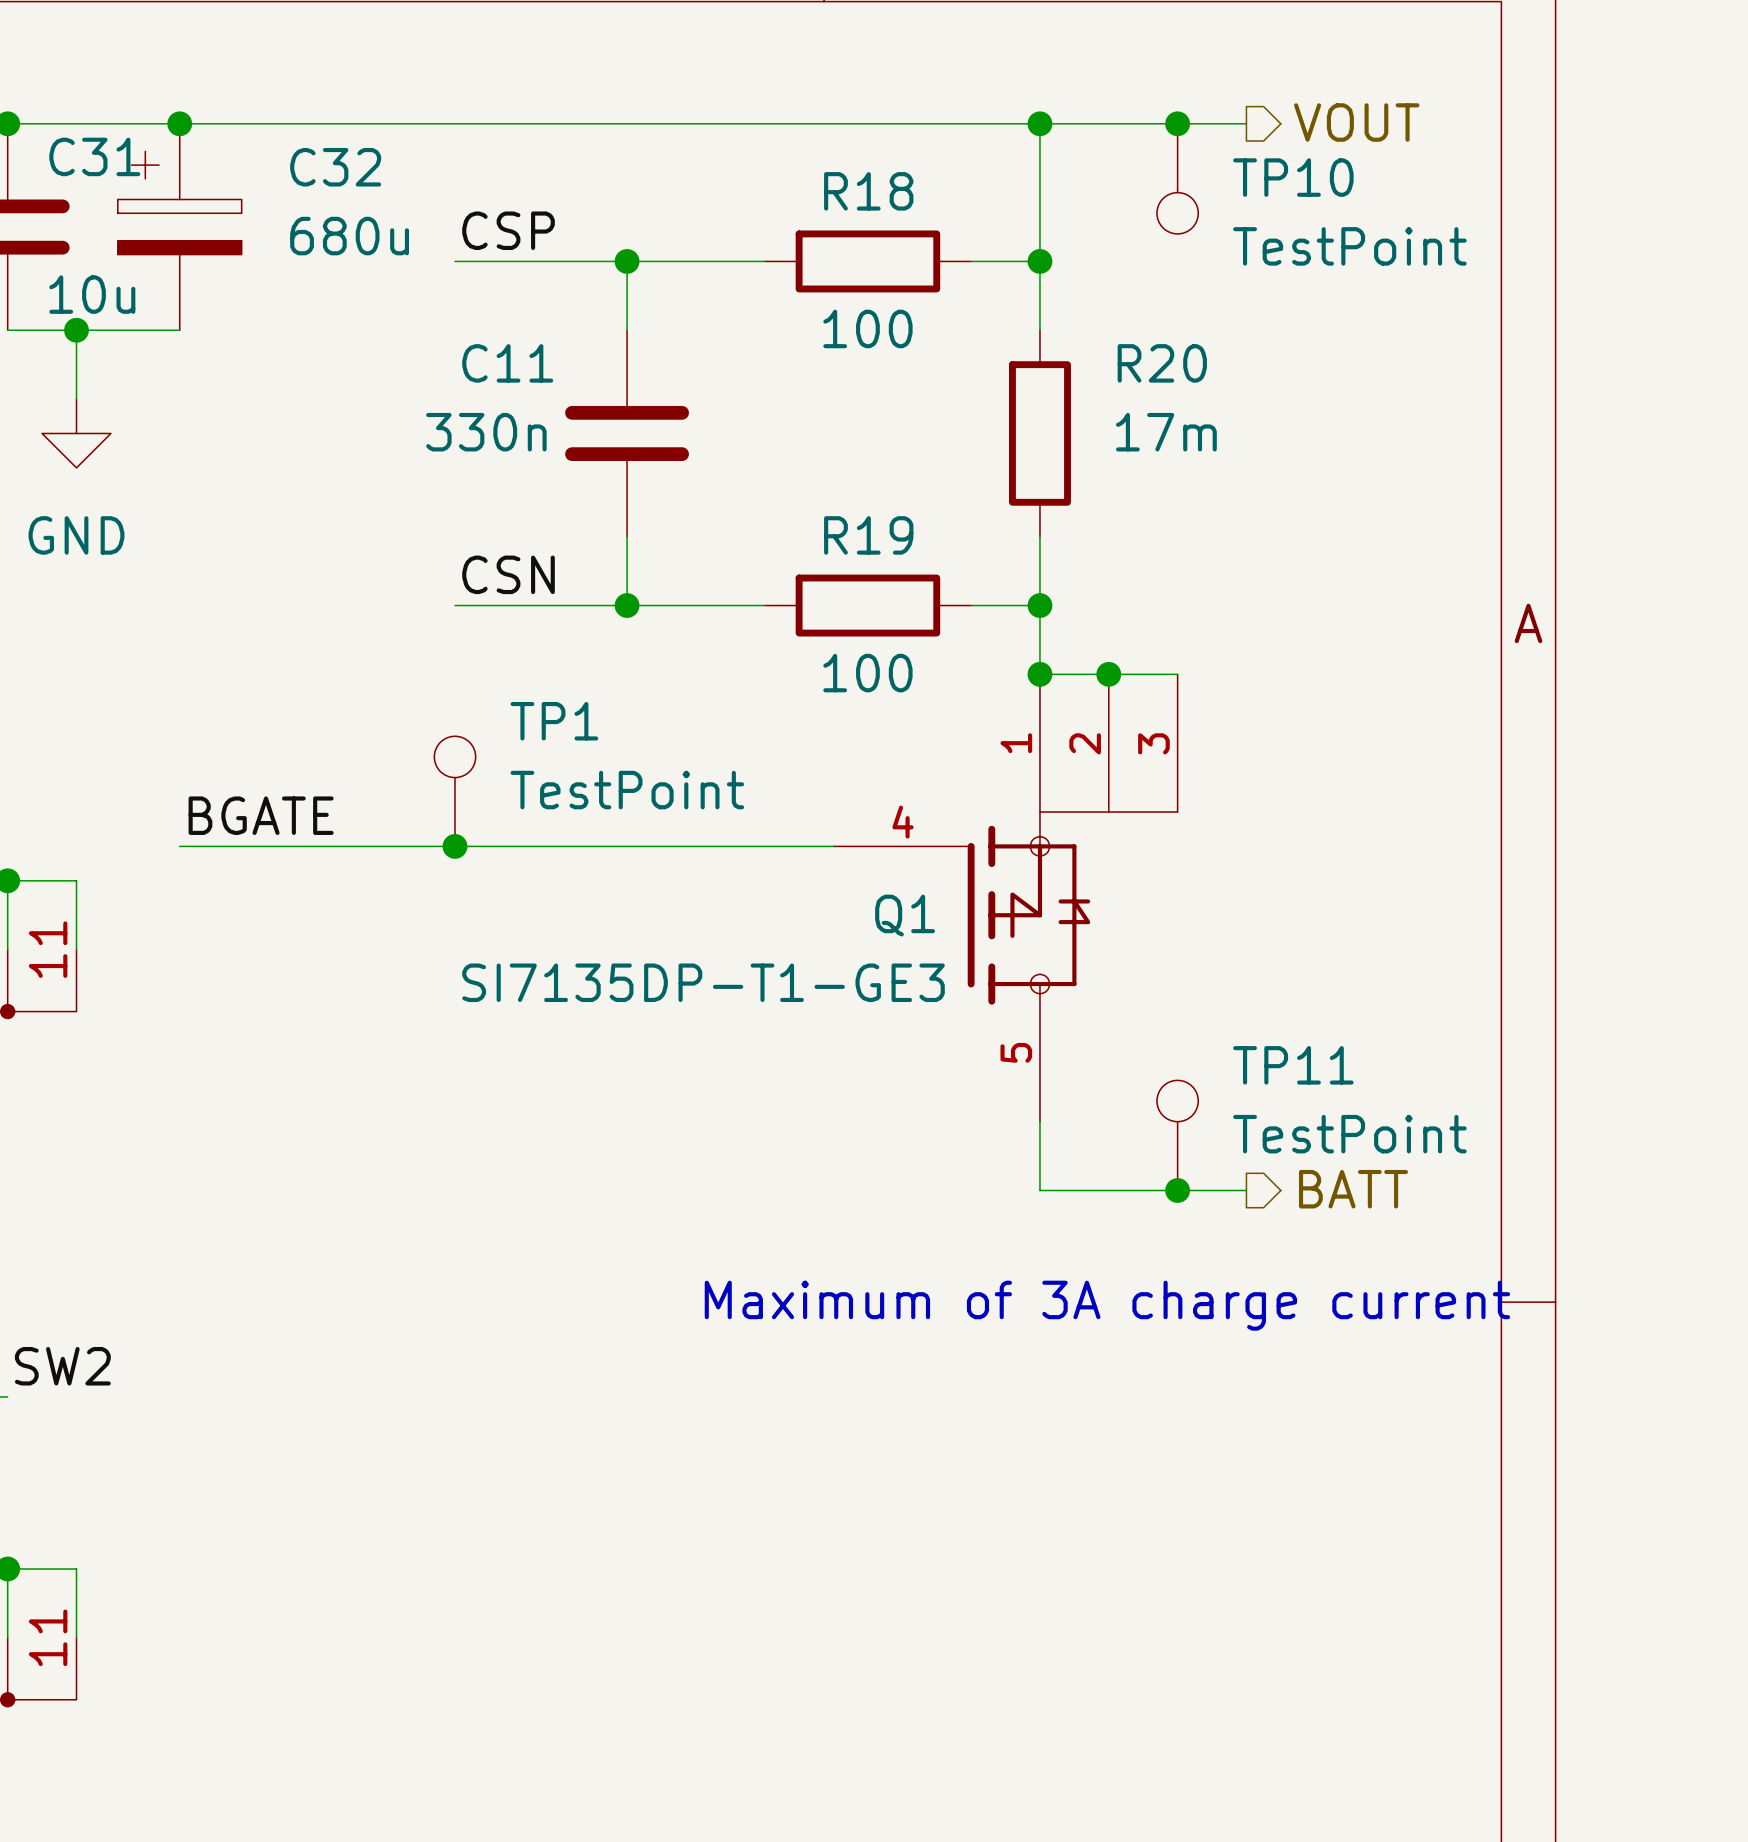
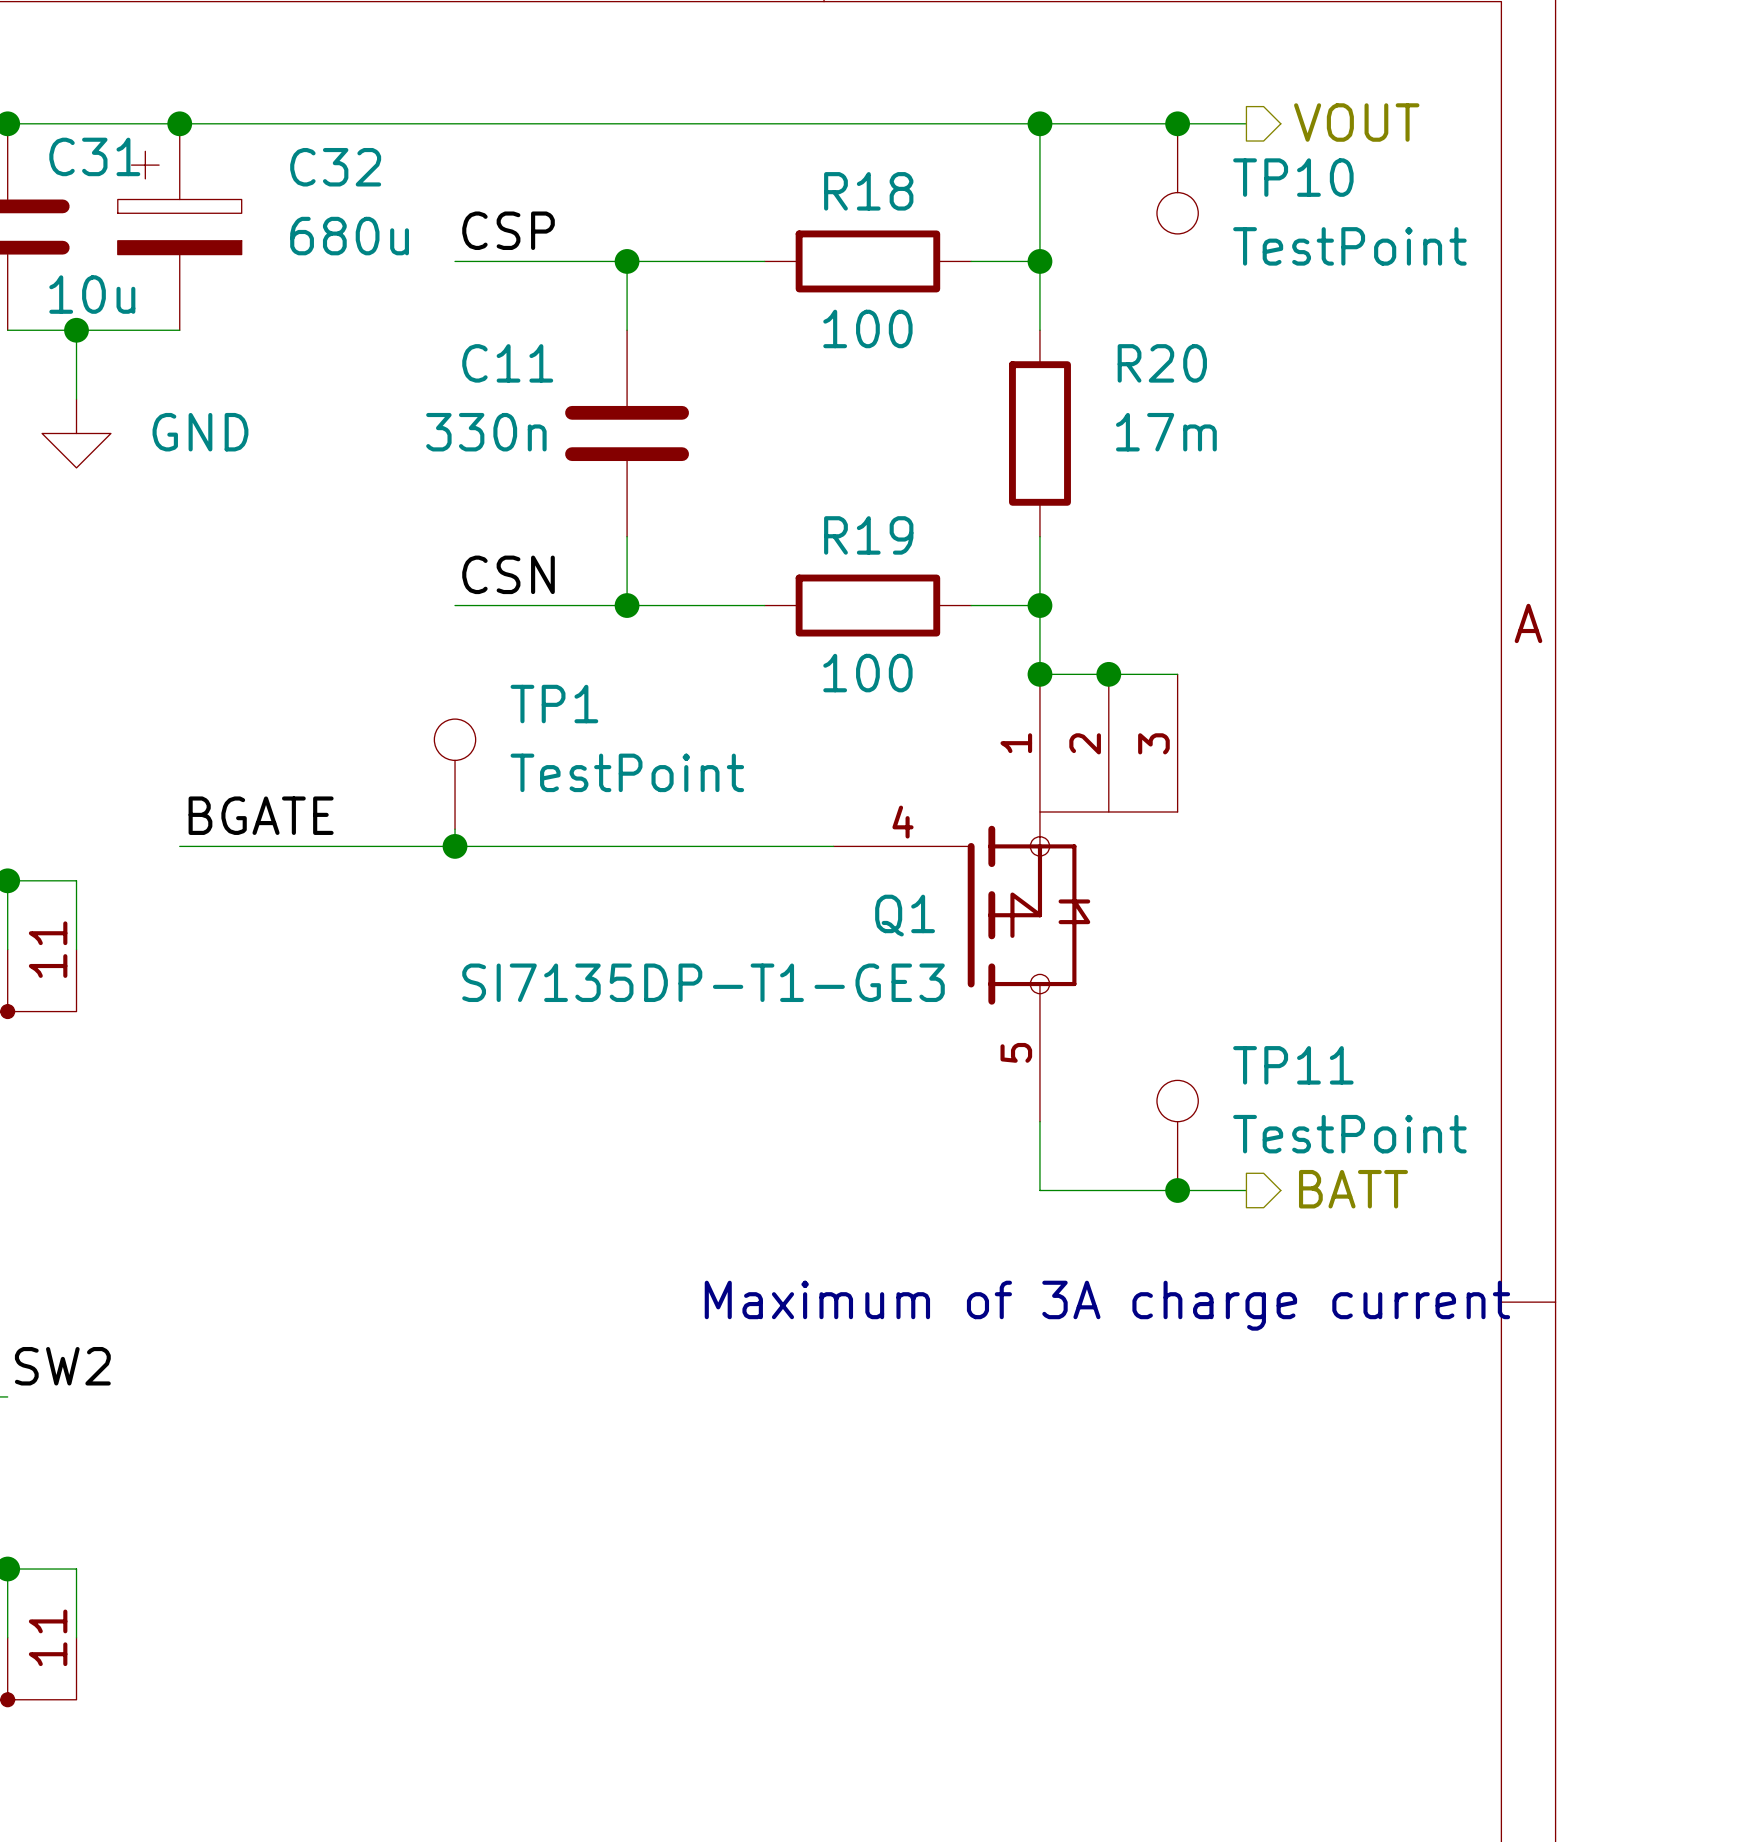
power symbol text position: GND (76, 535) -> GND (200, 432)
TP1 position: (455, 791) -> (455, 774)

